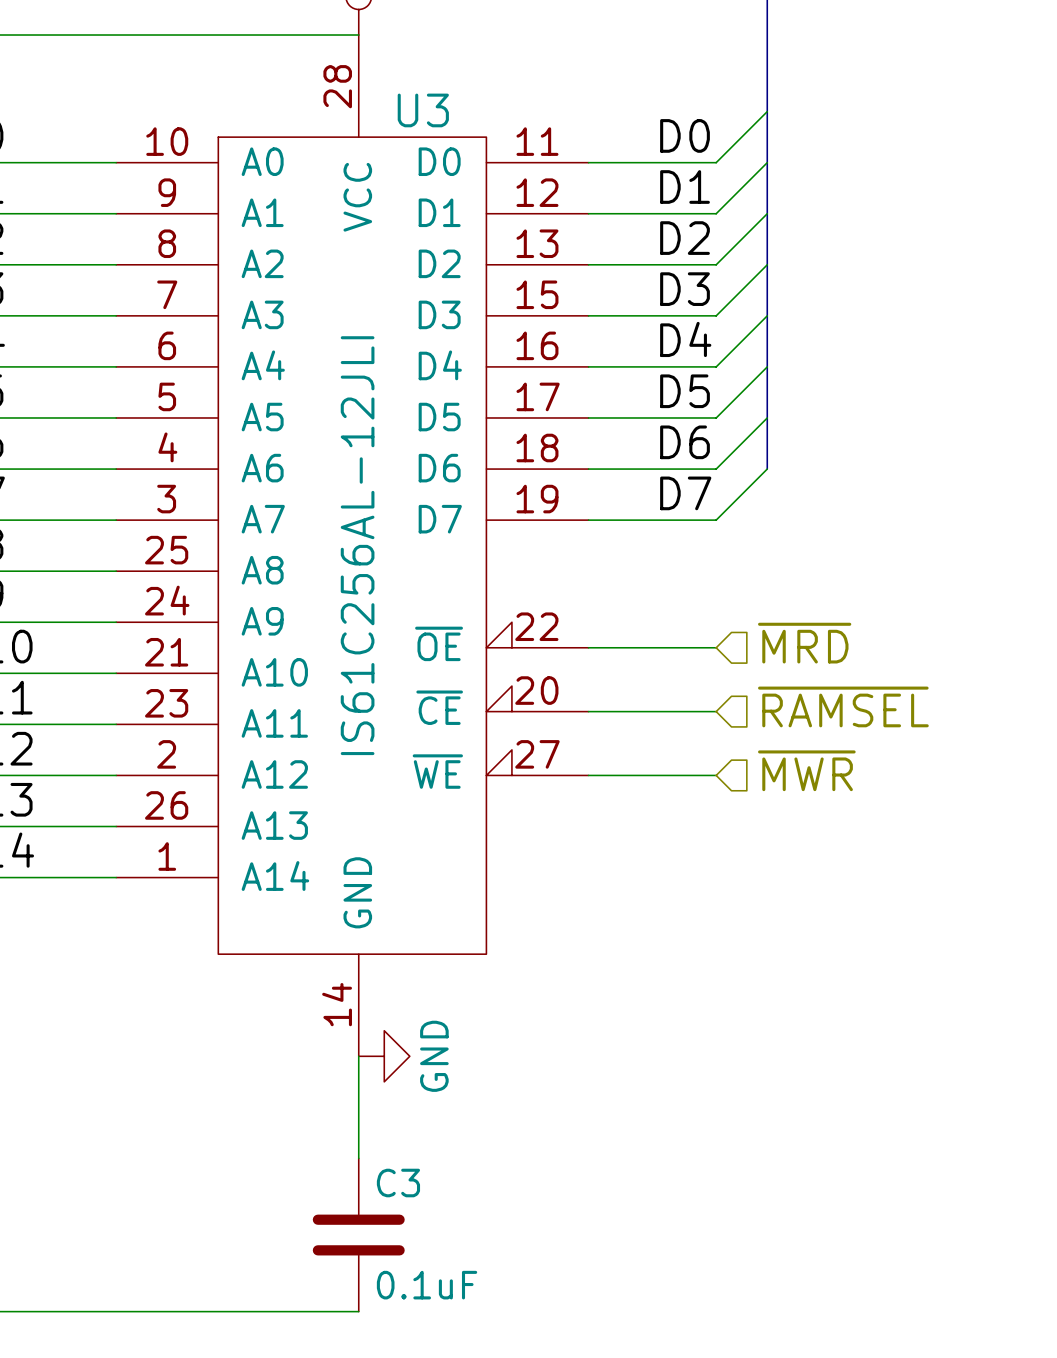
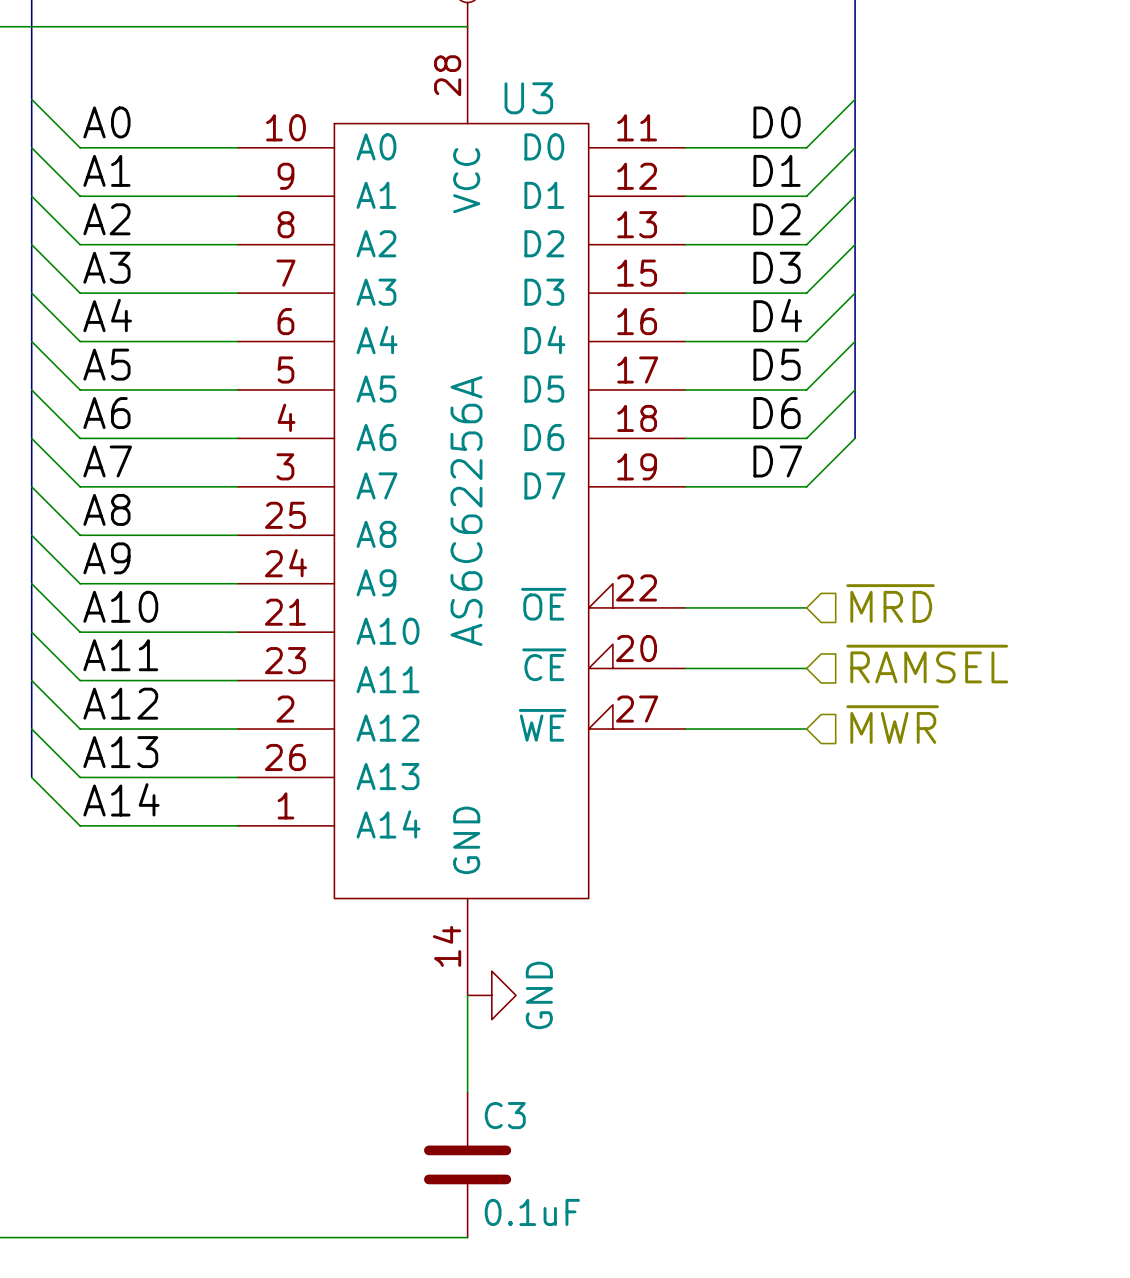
U3 value: IS61C256AL-12JLI (357, 545) -> AS6C62256A (466, 511)

